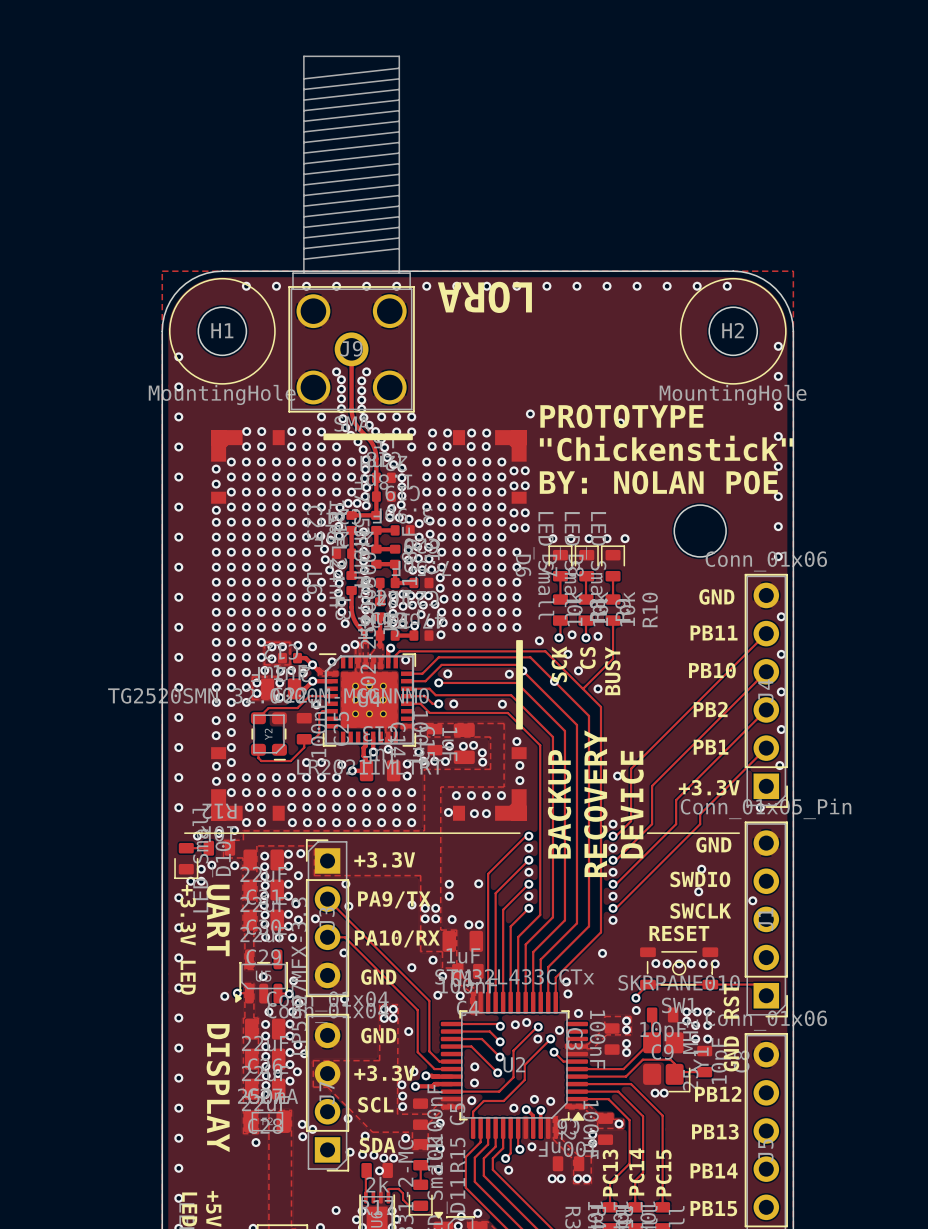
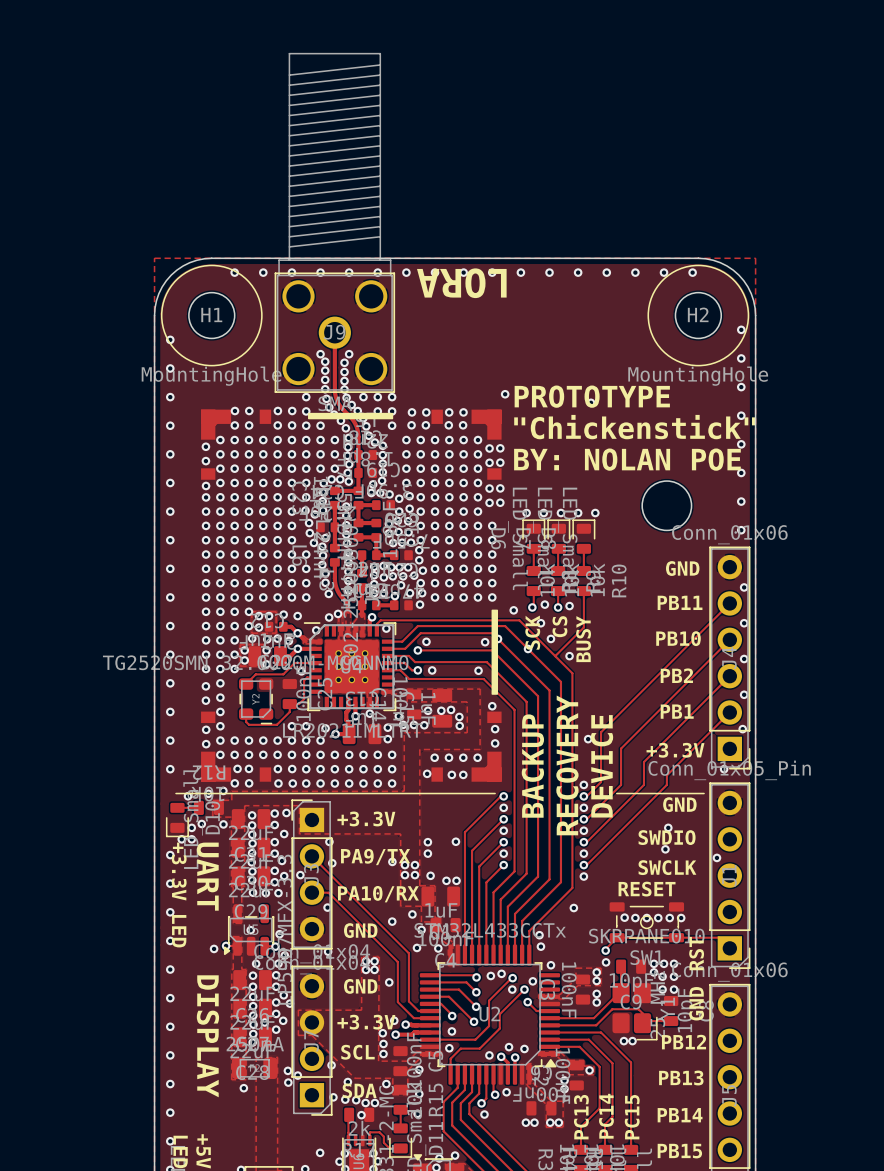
track: none -> (430, 1003) (441, 1003) (452, 1014) (452, 1018)

